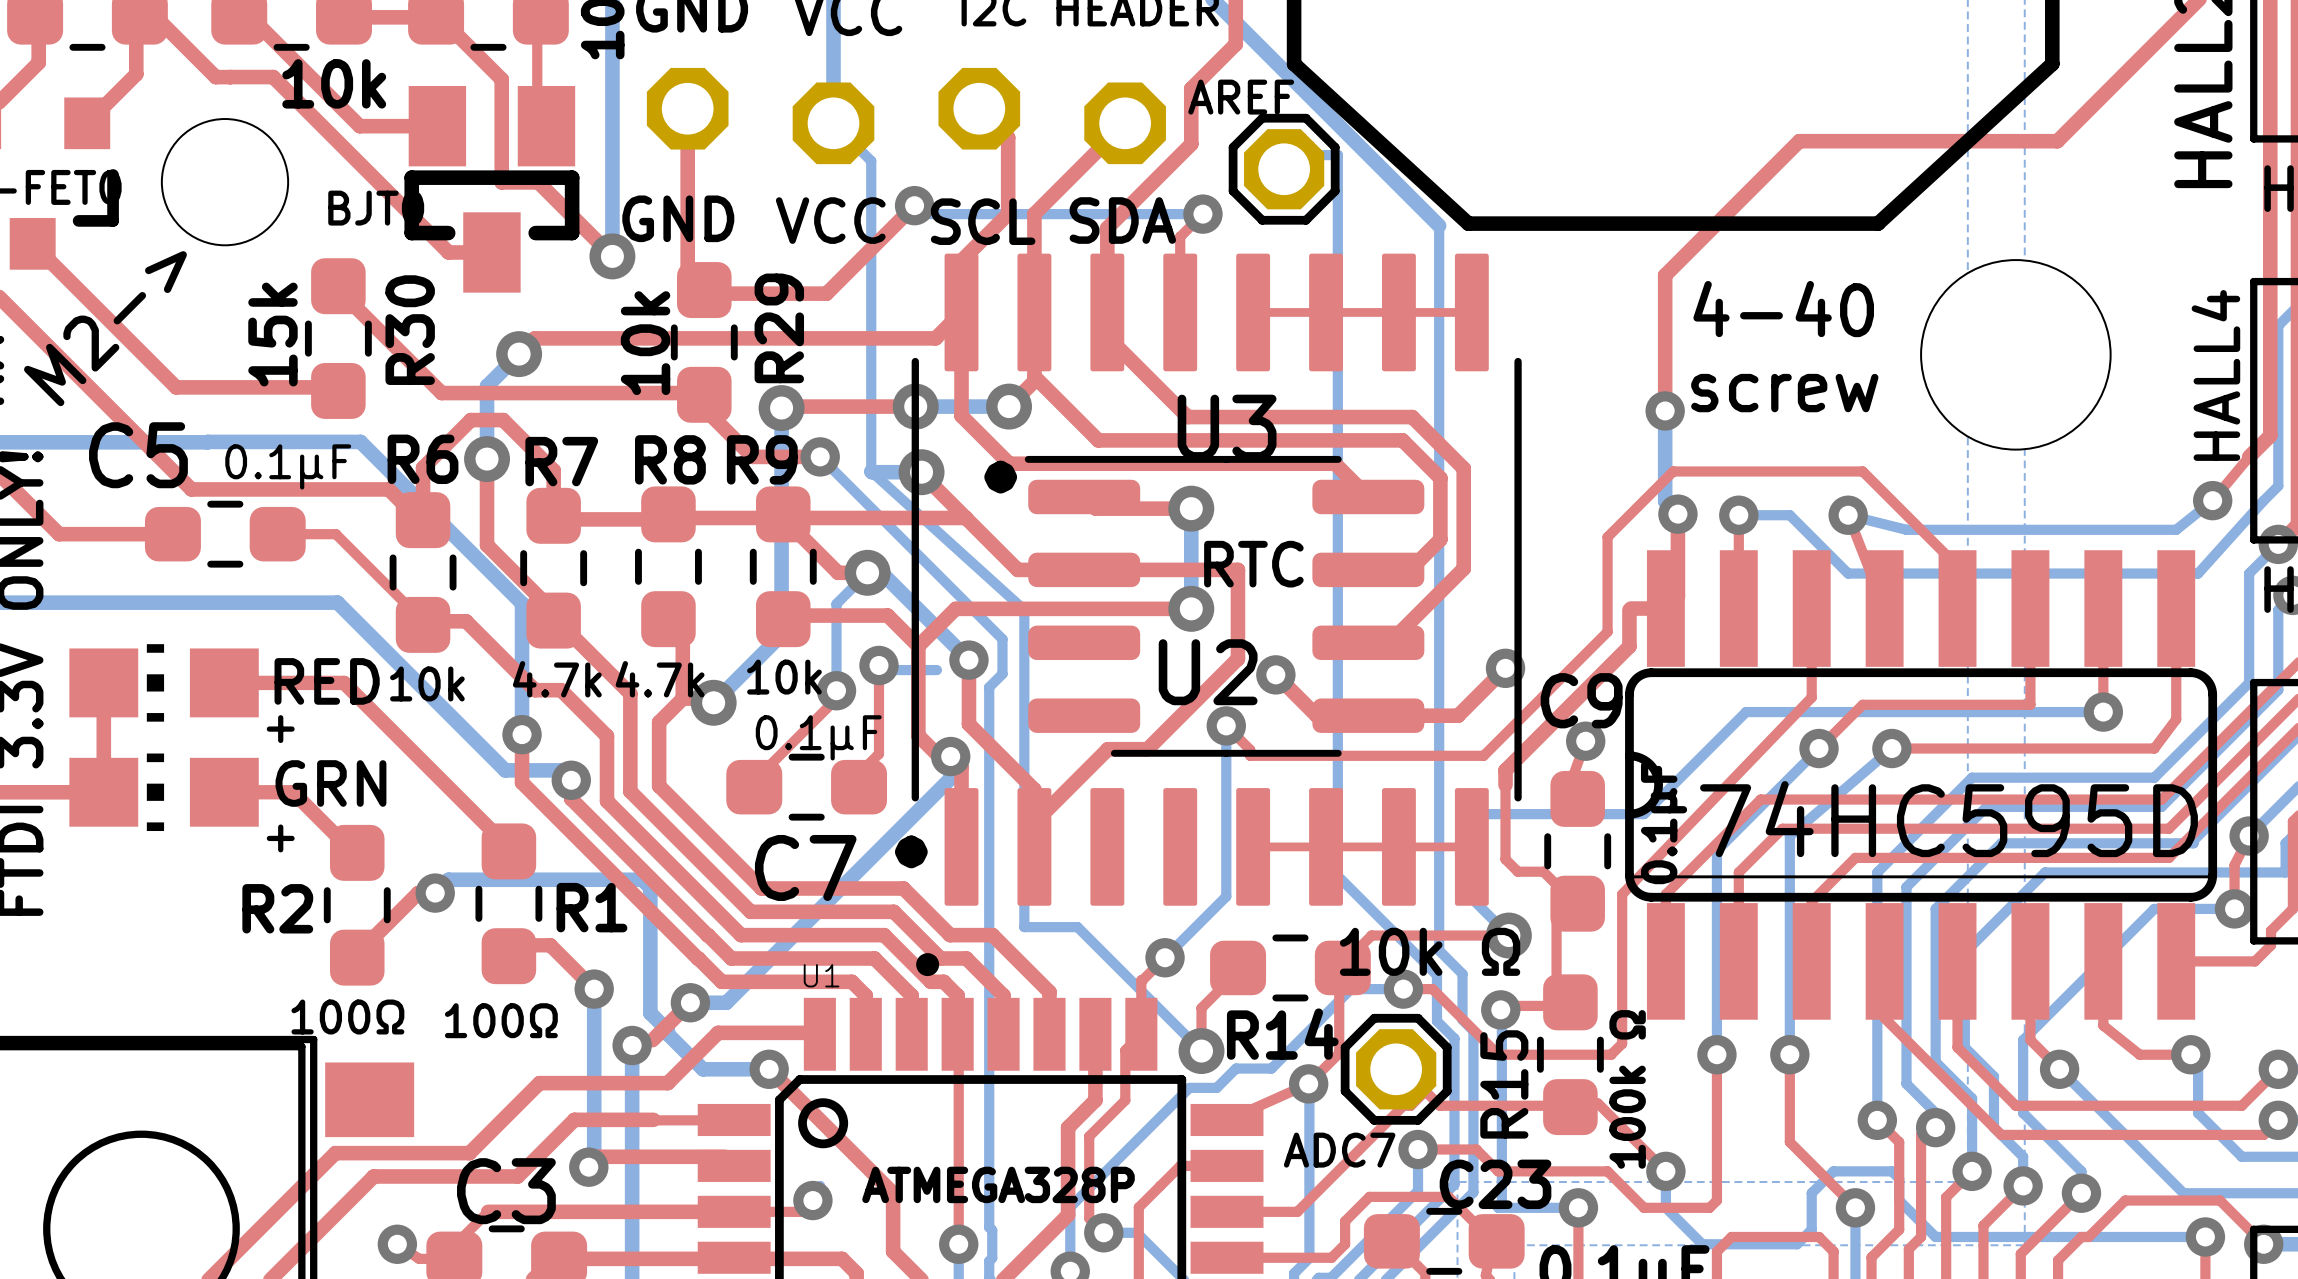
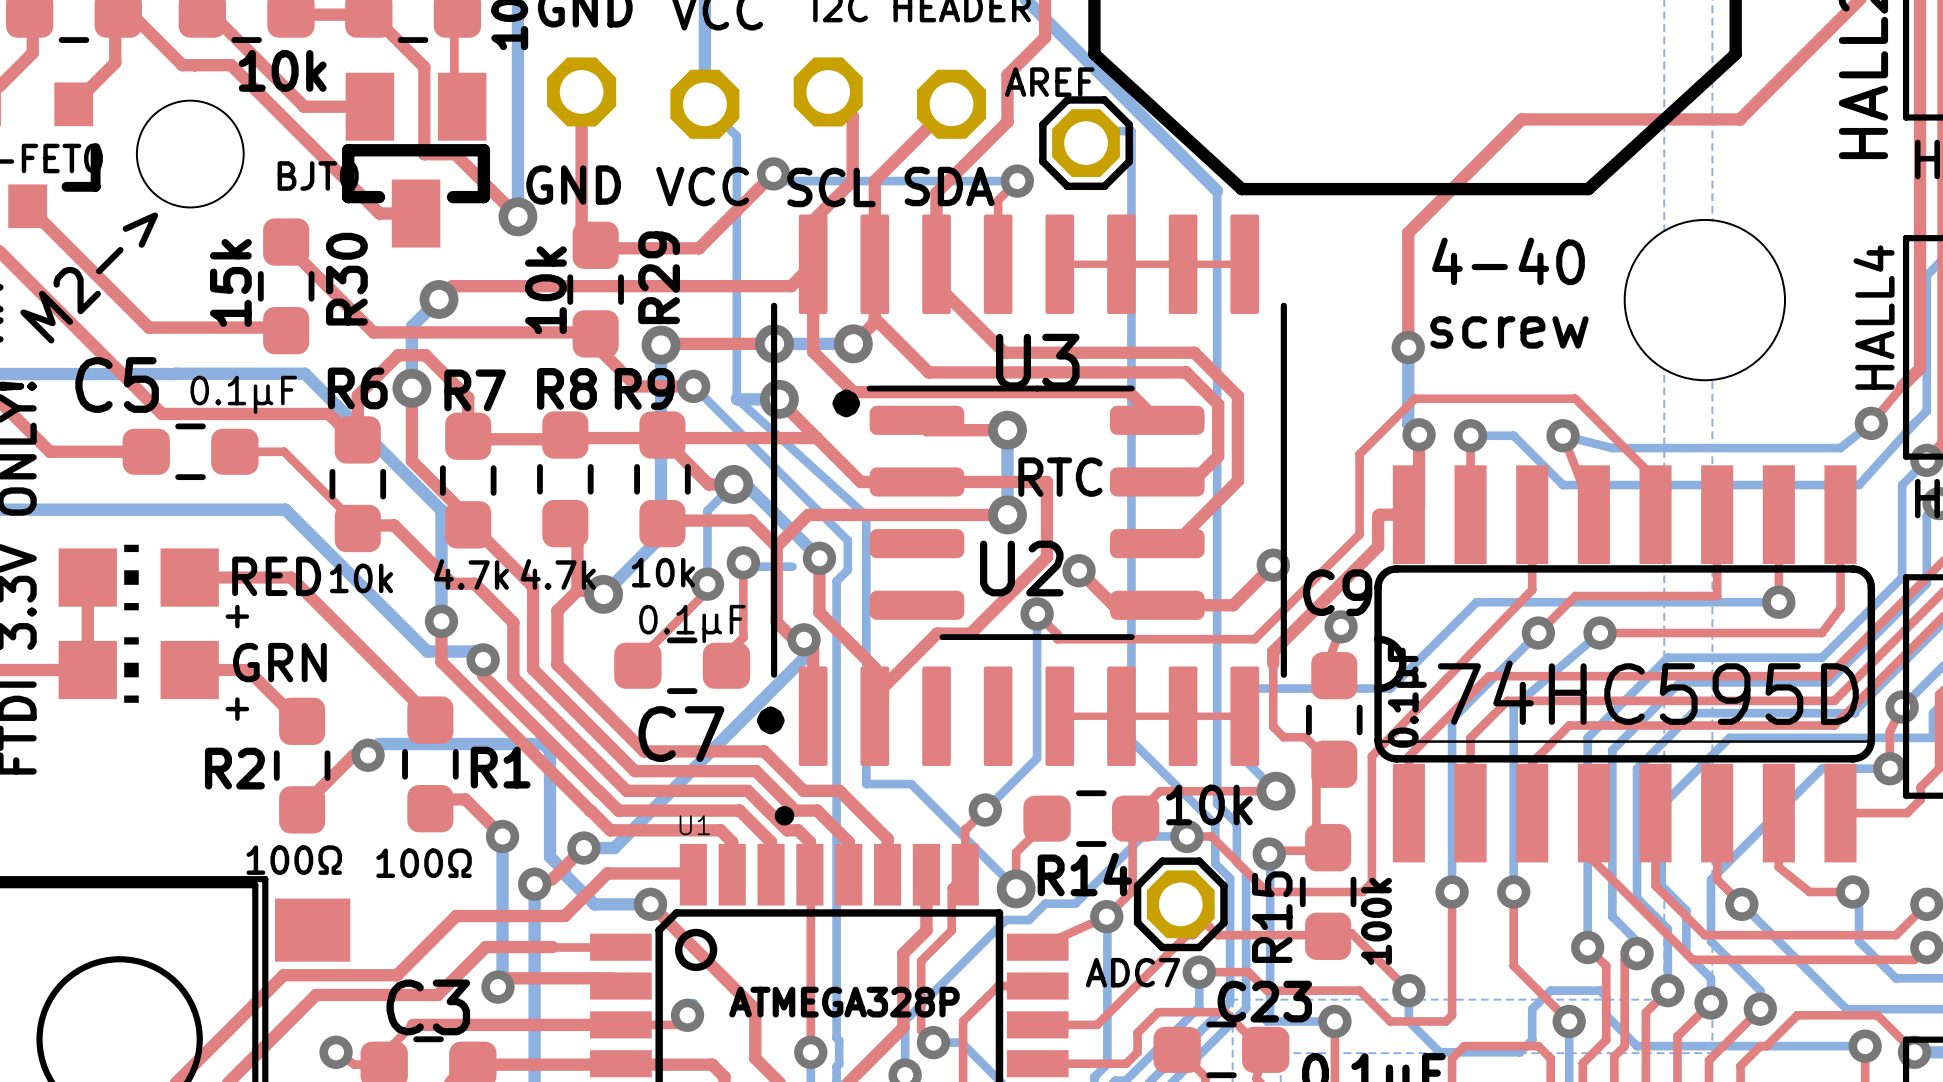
R14 value: 10k Ω (1430, 951) -> 10k (1209, 804)
R15 value: 100k Ω (1627, 1089) -> 100k (1376, 921)

